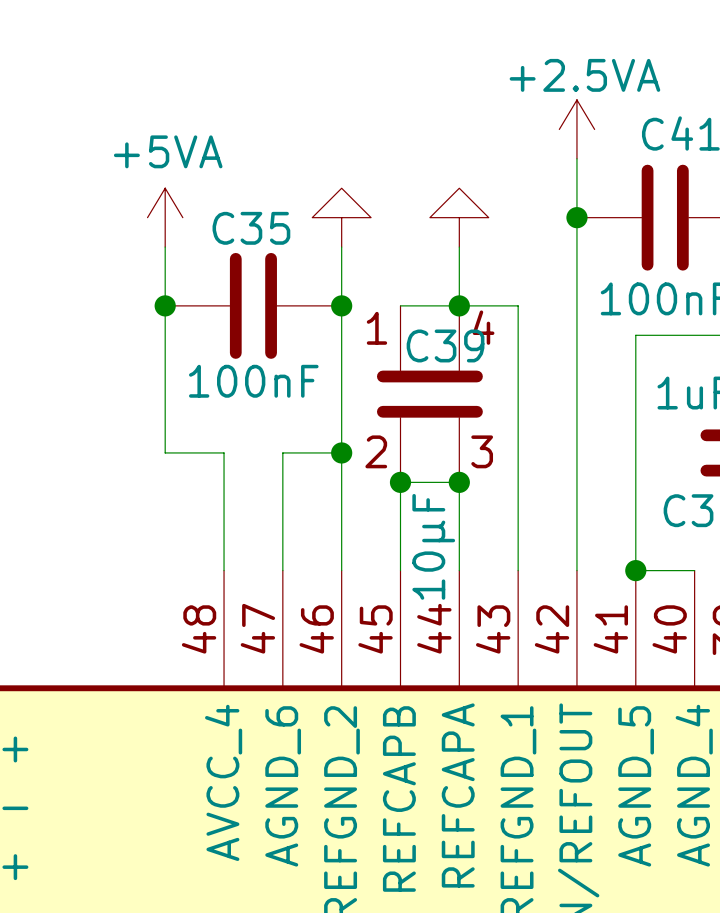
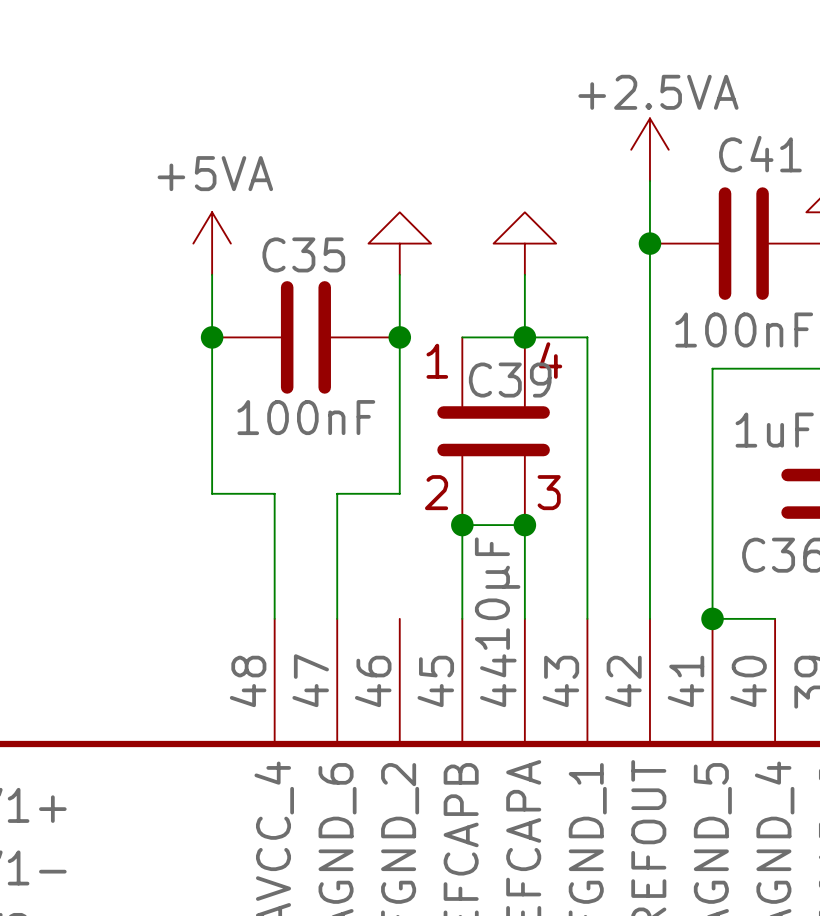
wire: (341, 452) (341, 570) -> none
junction: (341, 452) -> none

